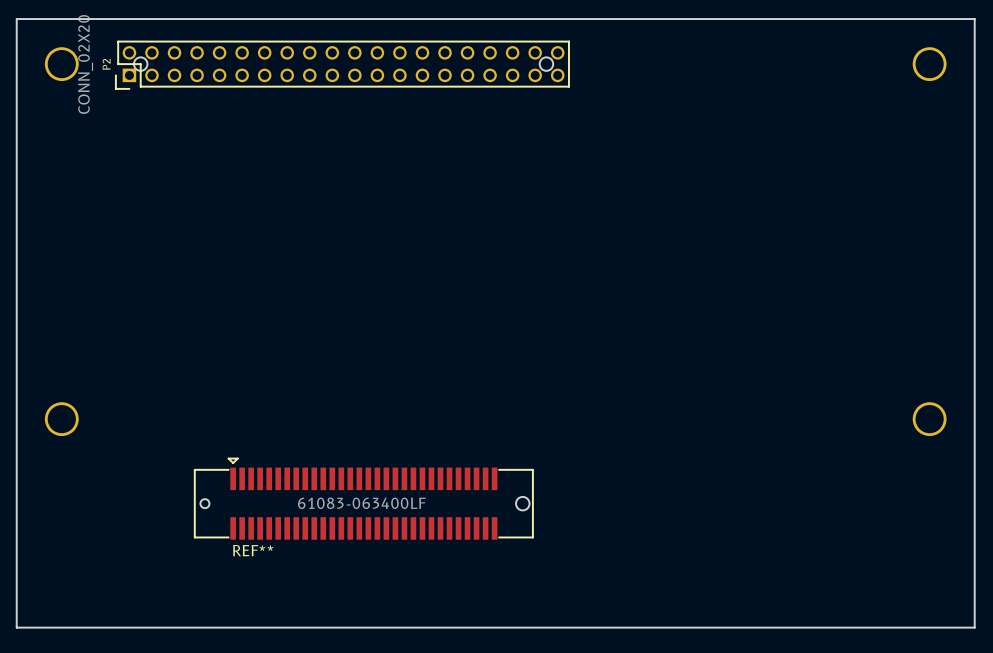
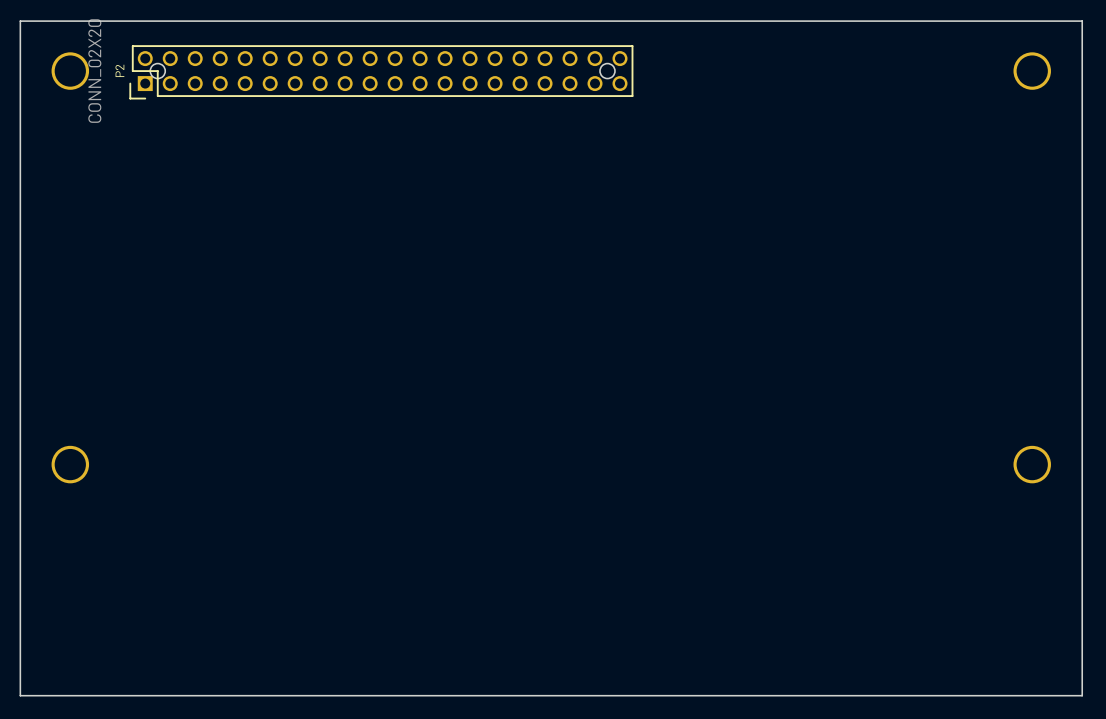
REF**: 61083-063400LF (363, 498) -> none

